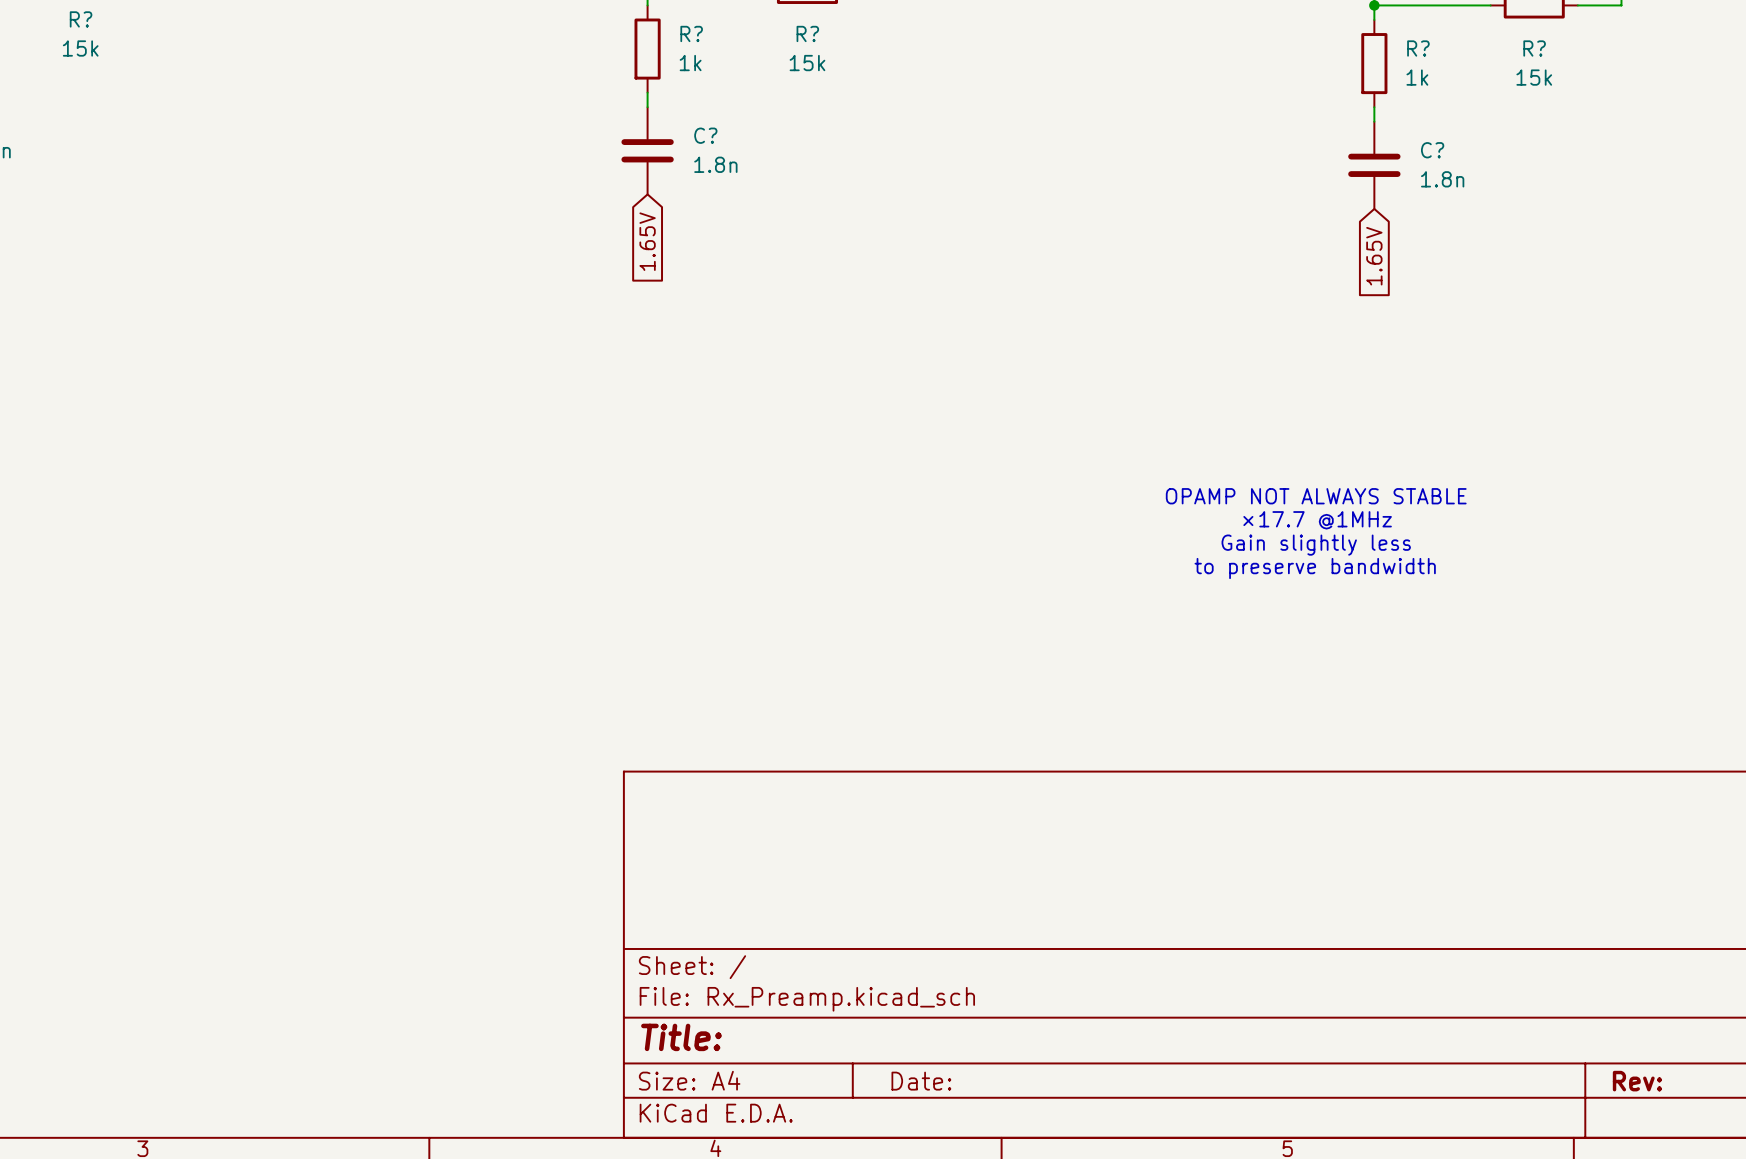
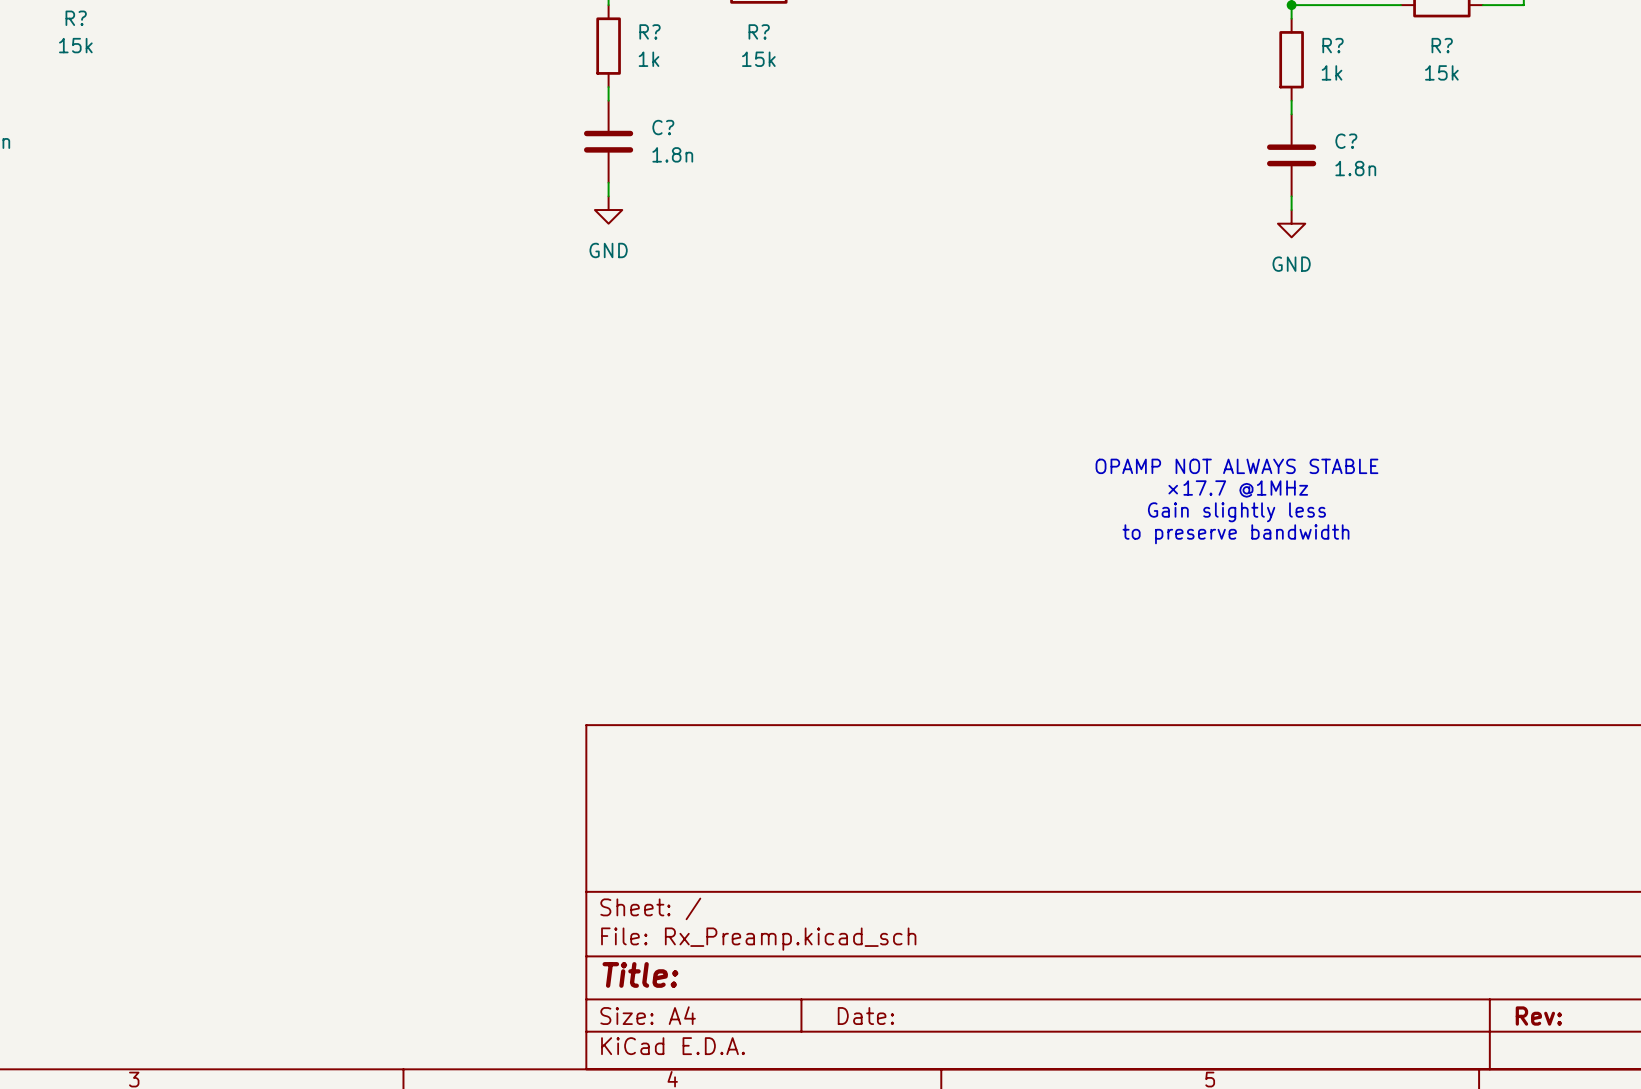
wire: none -> (608, 182) (608, 196)
wire: none -> (1291, 196) (1291, 210)
power symbol: none -> GND (608, 210)
power symbol: none -> GND (1291, 223)
global label: 1.65V (647, 241) -> none
global label: 1.65V (1374, 256) -> none

